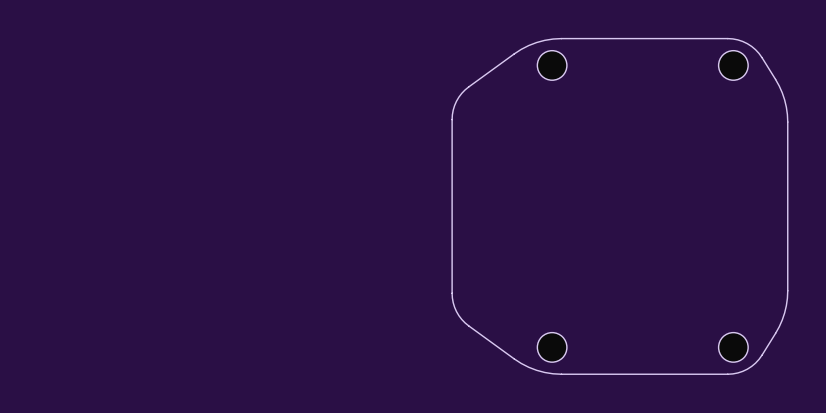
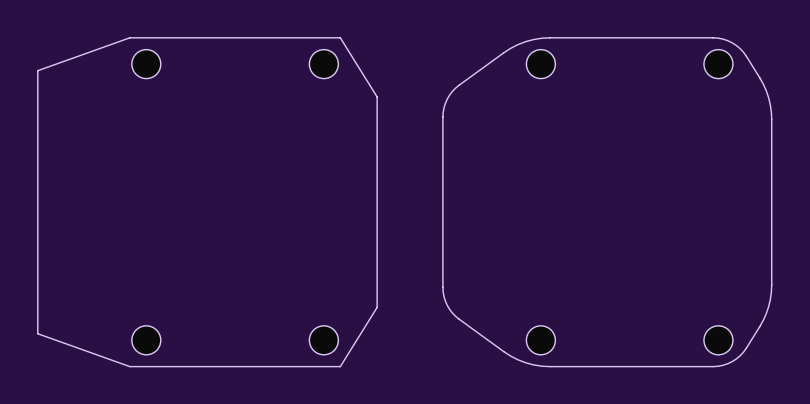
board edge: none -> (340, 37) (129, 37) (37, 70) (37, 333) (129, 366) (340, 366) (377, 307) (377, 96) (340, 37)
part: none -> (146, 64)
part: none -> (323, 64)
part: none -> (146, 340)
part: none -> (323, 340)

